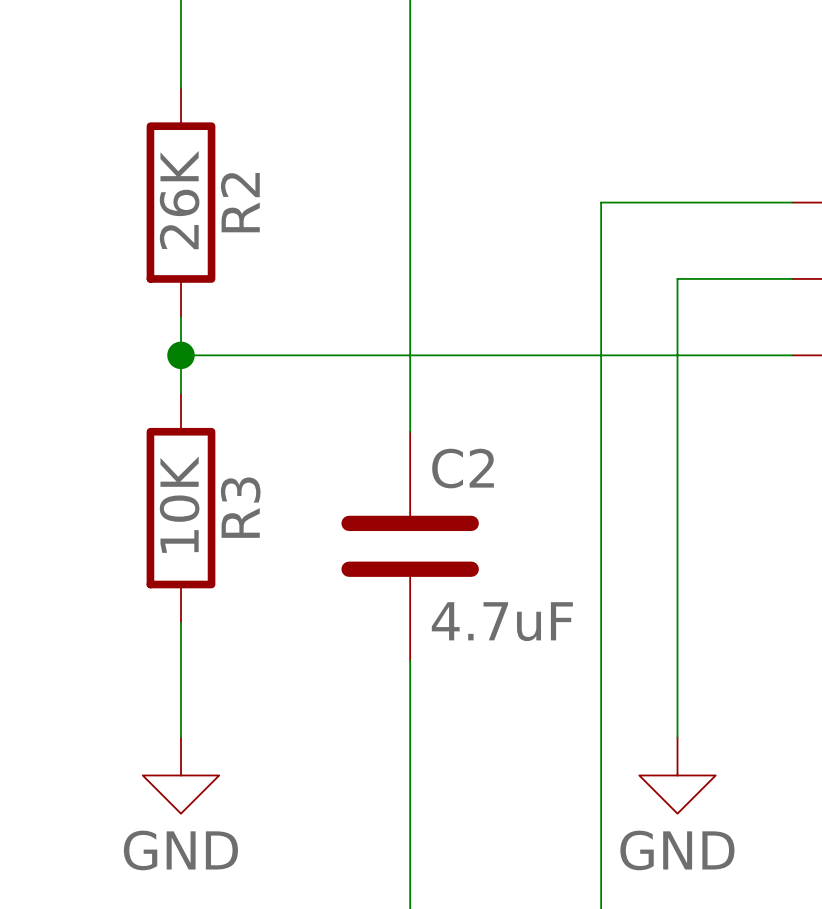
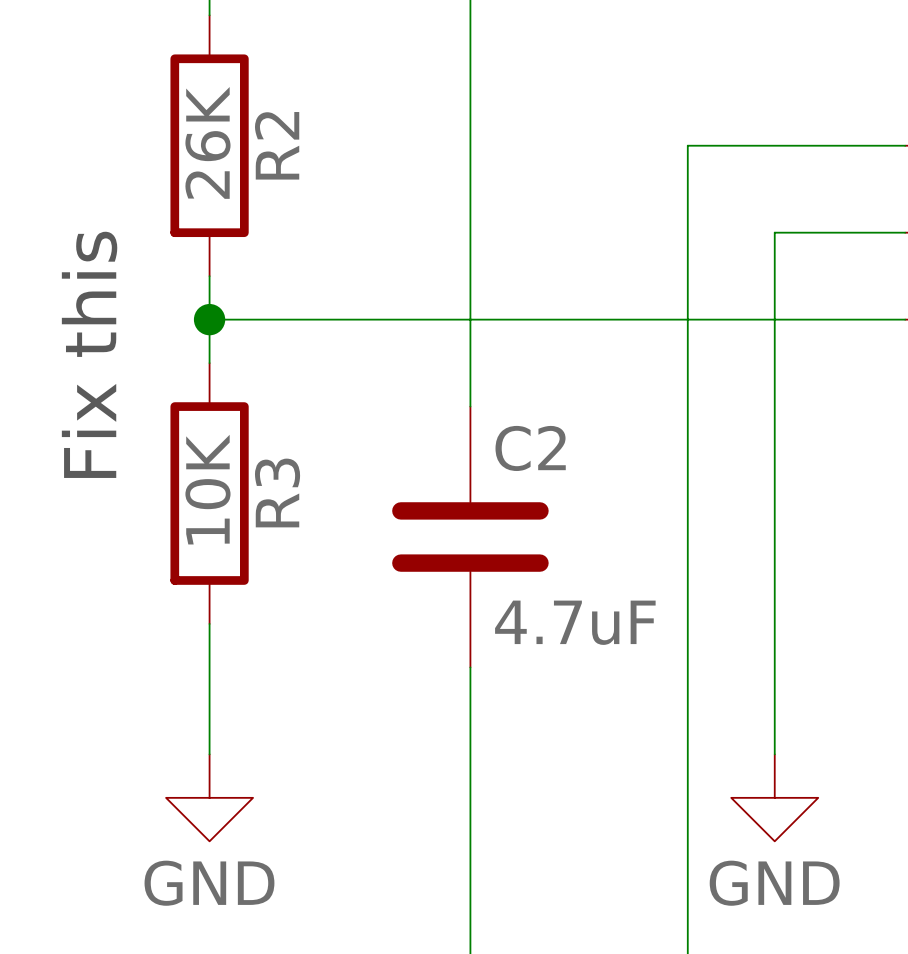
text: none -> Fix this (89, 354)

